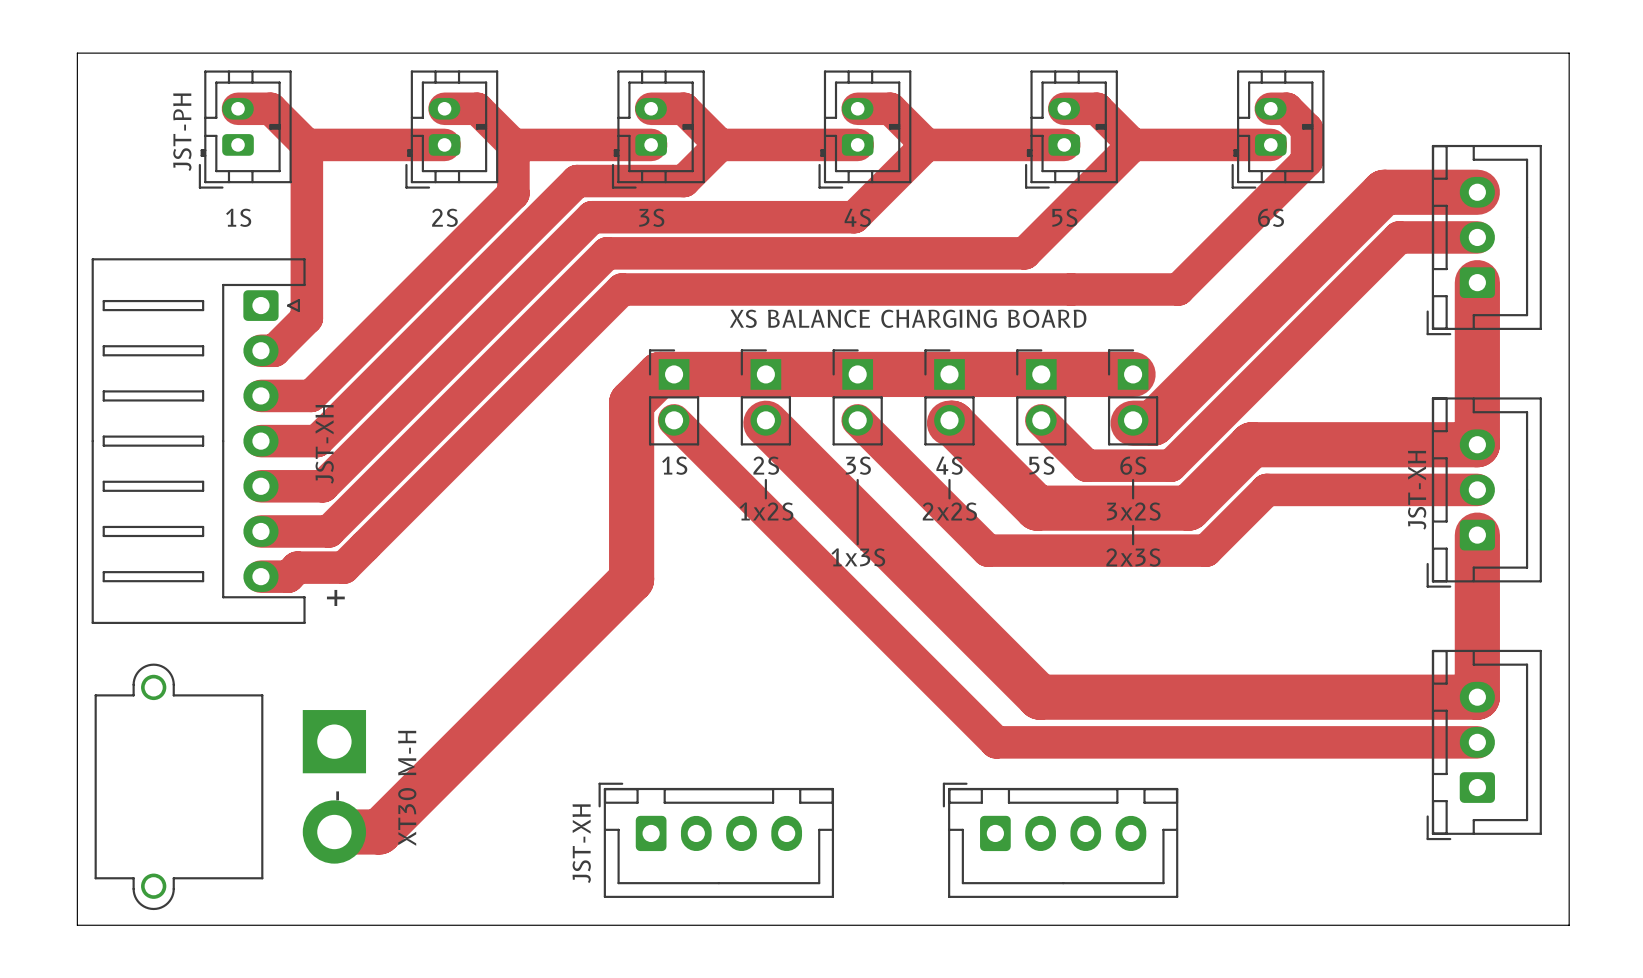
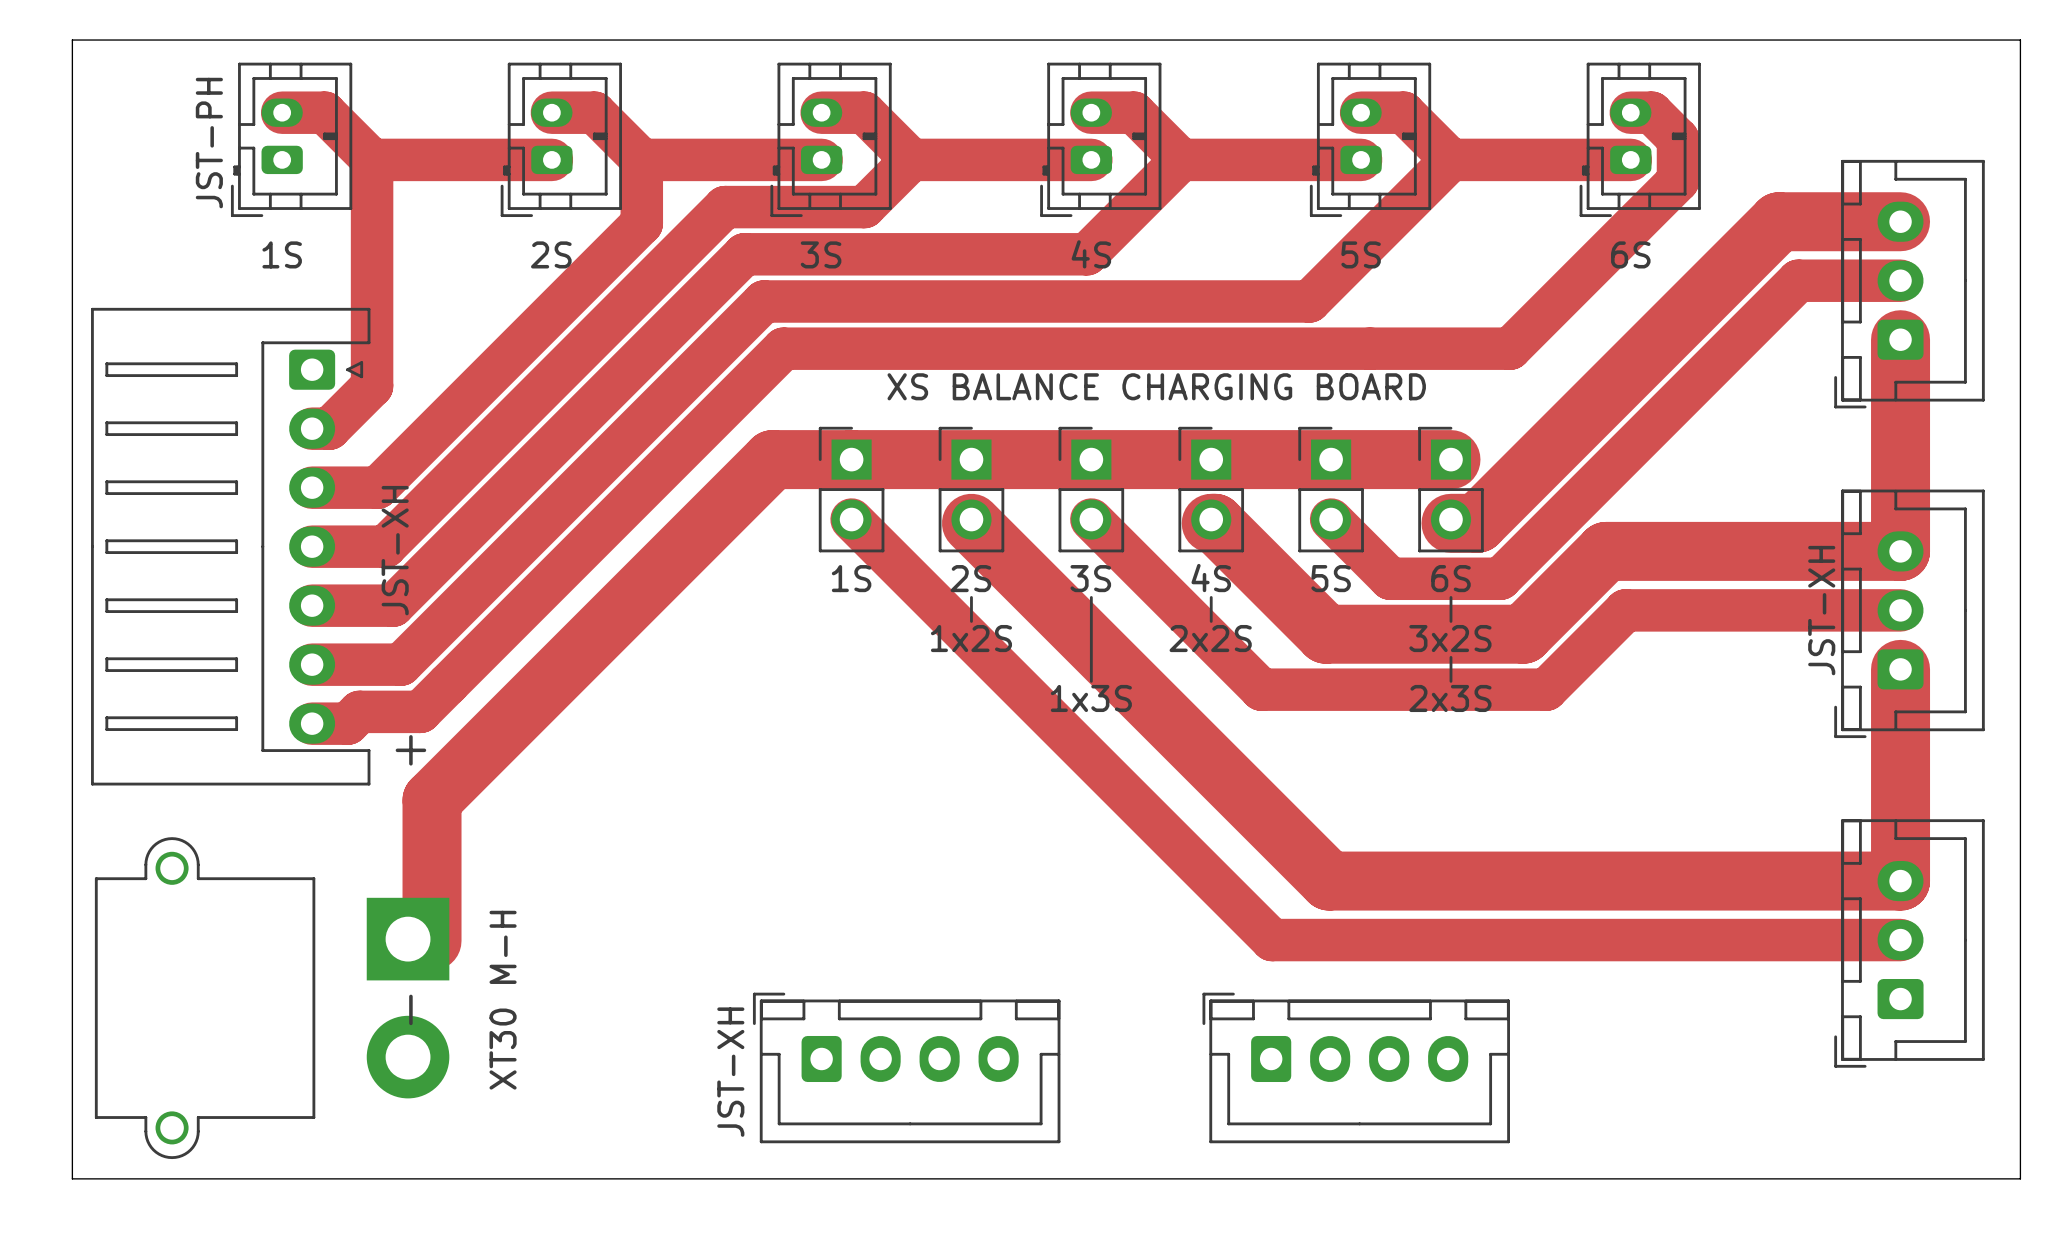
track: (659, 374) (631, 402) (631, 579) (379, 832) (334, 832) -> (833, 459) (772, 459) (432, 800) (432, 941)

